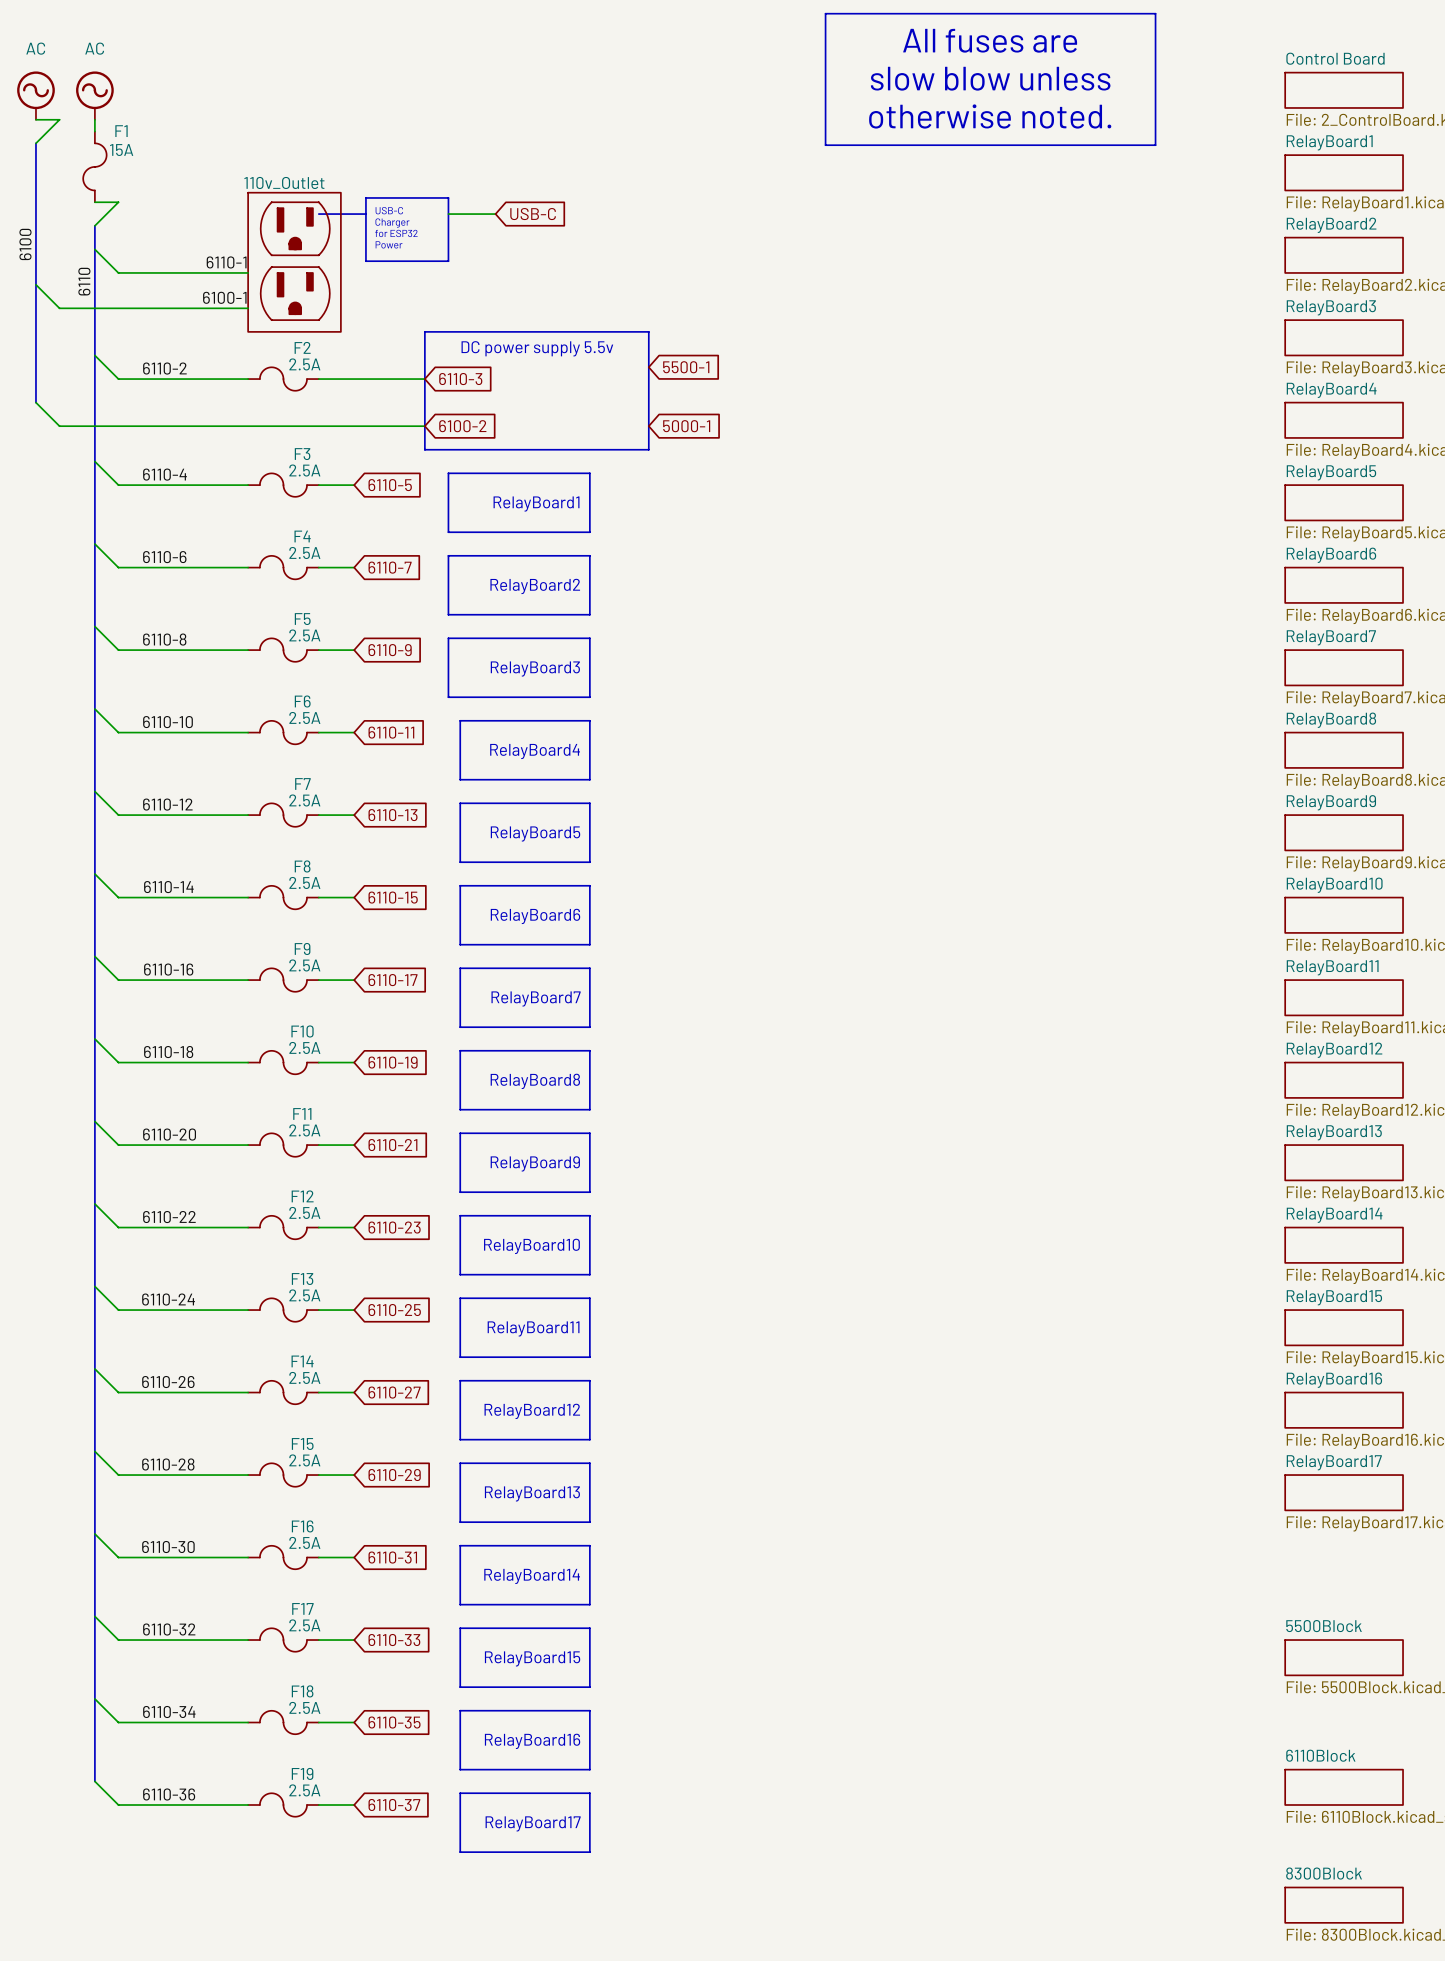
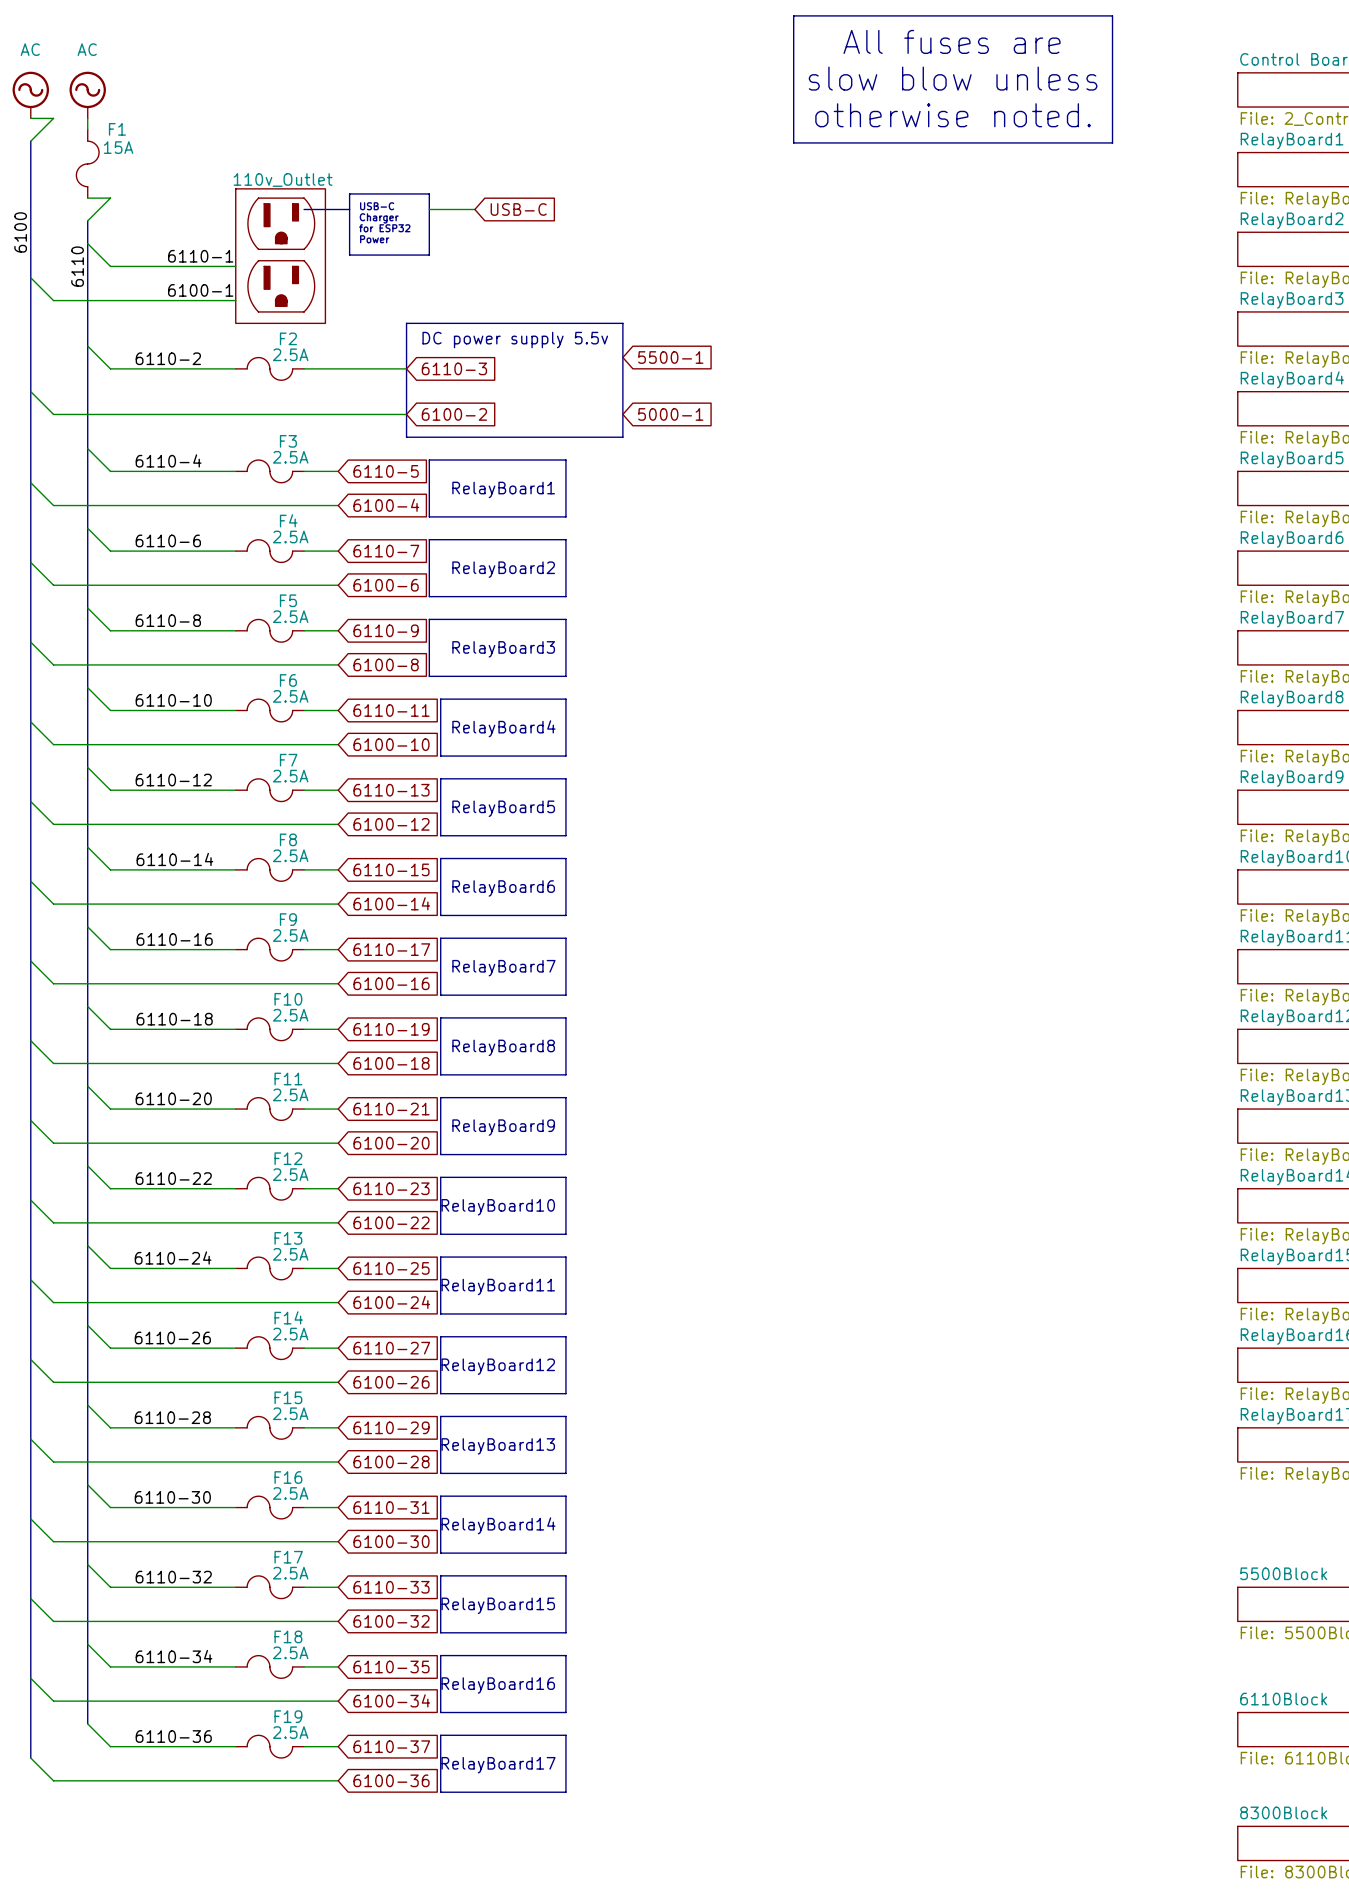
bus: none -> (30, 391) (30, 1758)
wire: none -> (30, 482) (53, 505) (338, 505)
global label: none -> 6100-4 (386, 505)
wire: none -> (30, 562) (53, 585) (338, 585)
global label: none -> 6100-6 (386, 585)
wire: none -> (30, 642) (53, 664) (338, 664)
global label: none -> 6100-8 (386, 664)
wire: none -> (30, 721) (53, 744) (338, 744)
global label: none -> 6100-10 (391, 744)
wire: none -> (30, 801) (53, 824) (338, 824)
global label: none -> 6100-12 (391, 824)
wire: none -> (30, 881) (53, 904) (338, 904)
global label: none -> 6100-14 (391, 903)
wire: none -> (30, 961) (53, 983) (338, 983)
global label: none -> 6100-16 (391, 983)
wire: none -> (30, 1040) (53, 1063) (338, 1063)
global label: none -> 6100-18 (391, 1063)
wire: none -> (30, 1120) (53, 1143) (338, 1143)
global label: none -> 6100-20 (391, 1143)
wire: none -> (30, 1200) (53, 1222) (338, 1222)
global label: none -> 6100-22 (391, 1222)
wire: none -> (30, 1279) (53, 1302) (338, 1302)
global label: none -> 6100-24 (391, 1302)
wire: none -> (30, 1359) (53, 1382) (338, 1382)
global label: none -> 6100-26 (391, 1382)
wire: none -> (30, 1439) (53, 1462) (338, 1462)
global label: none -> 6100-28 (391, 1462)
wire: none -> (30, 1518) (53, 1541) (338, 1541)
global label: none -> 6100-30 (391, 1541)
wire: none -> (30, 1598) (53, 1621) (338, 1621)
global label: none -> 6100-32 (391, 1621)
wire: none -> (30, 1678) (53, 1701) (338, 1701)
global label: none -> 6100-34 (391, 1700)
wire: none -> (30, 1758) (53, 1780) (338, 1780)
global label: none -> 6100-36 (391, 1780)

